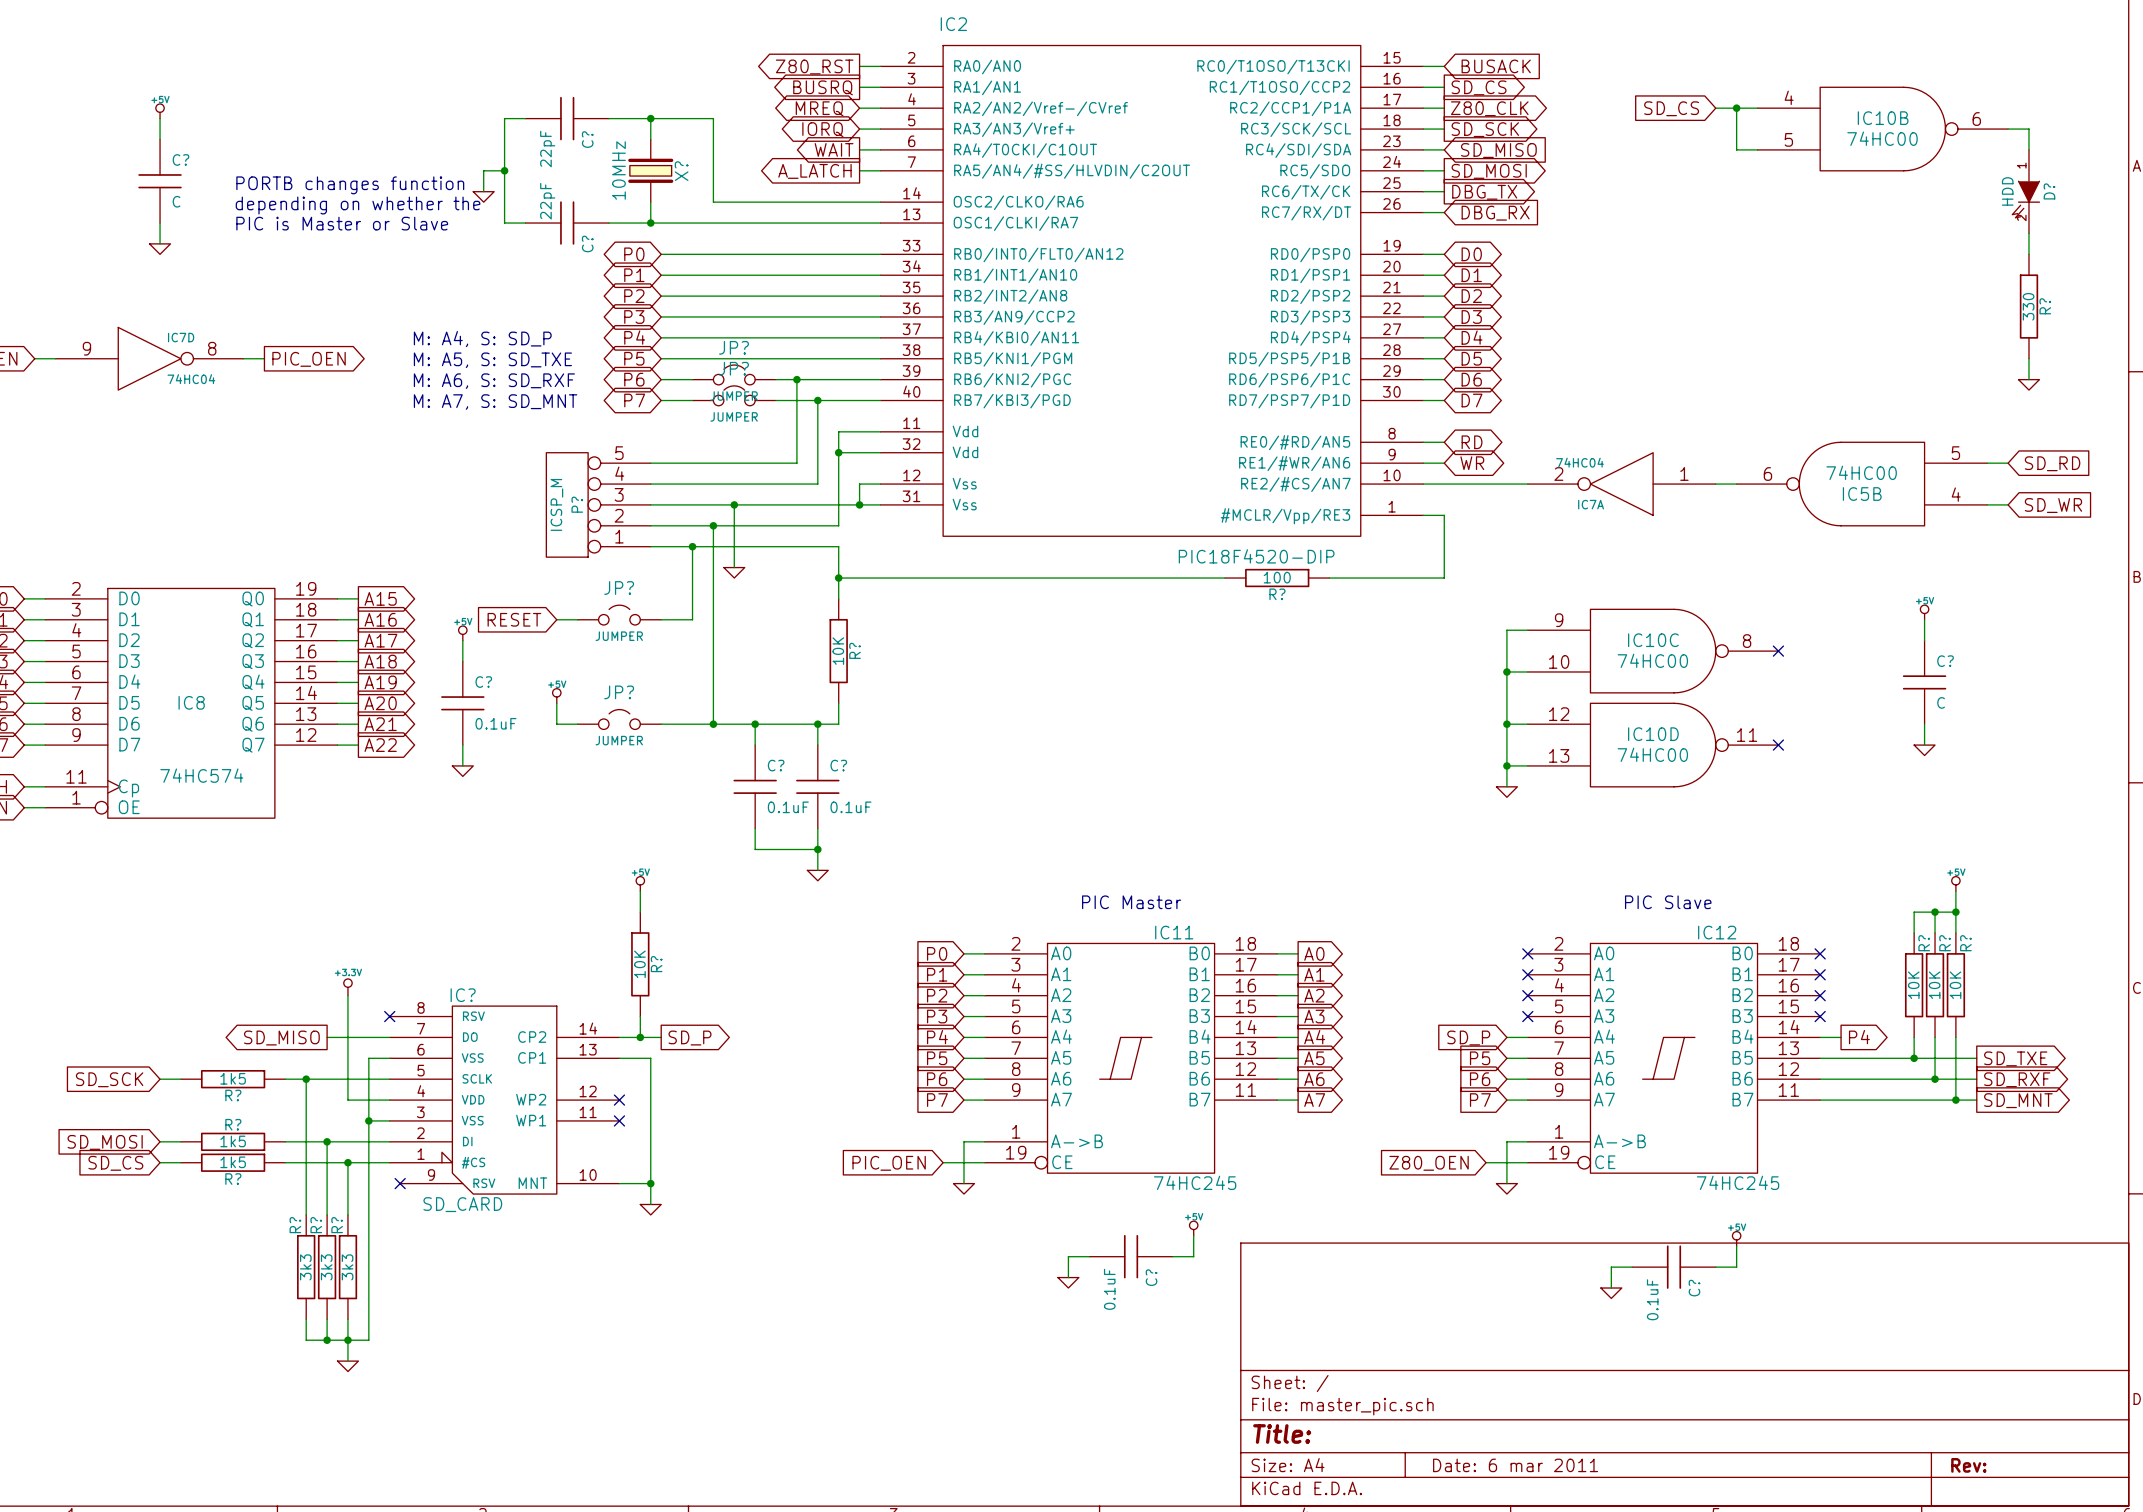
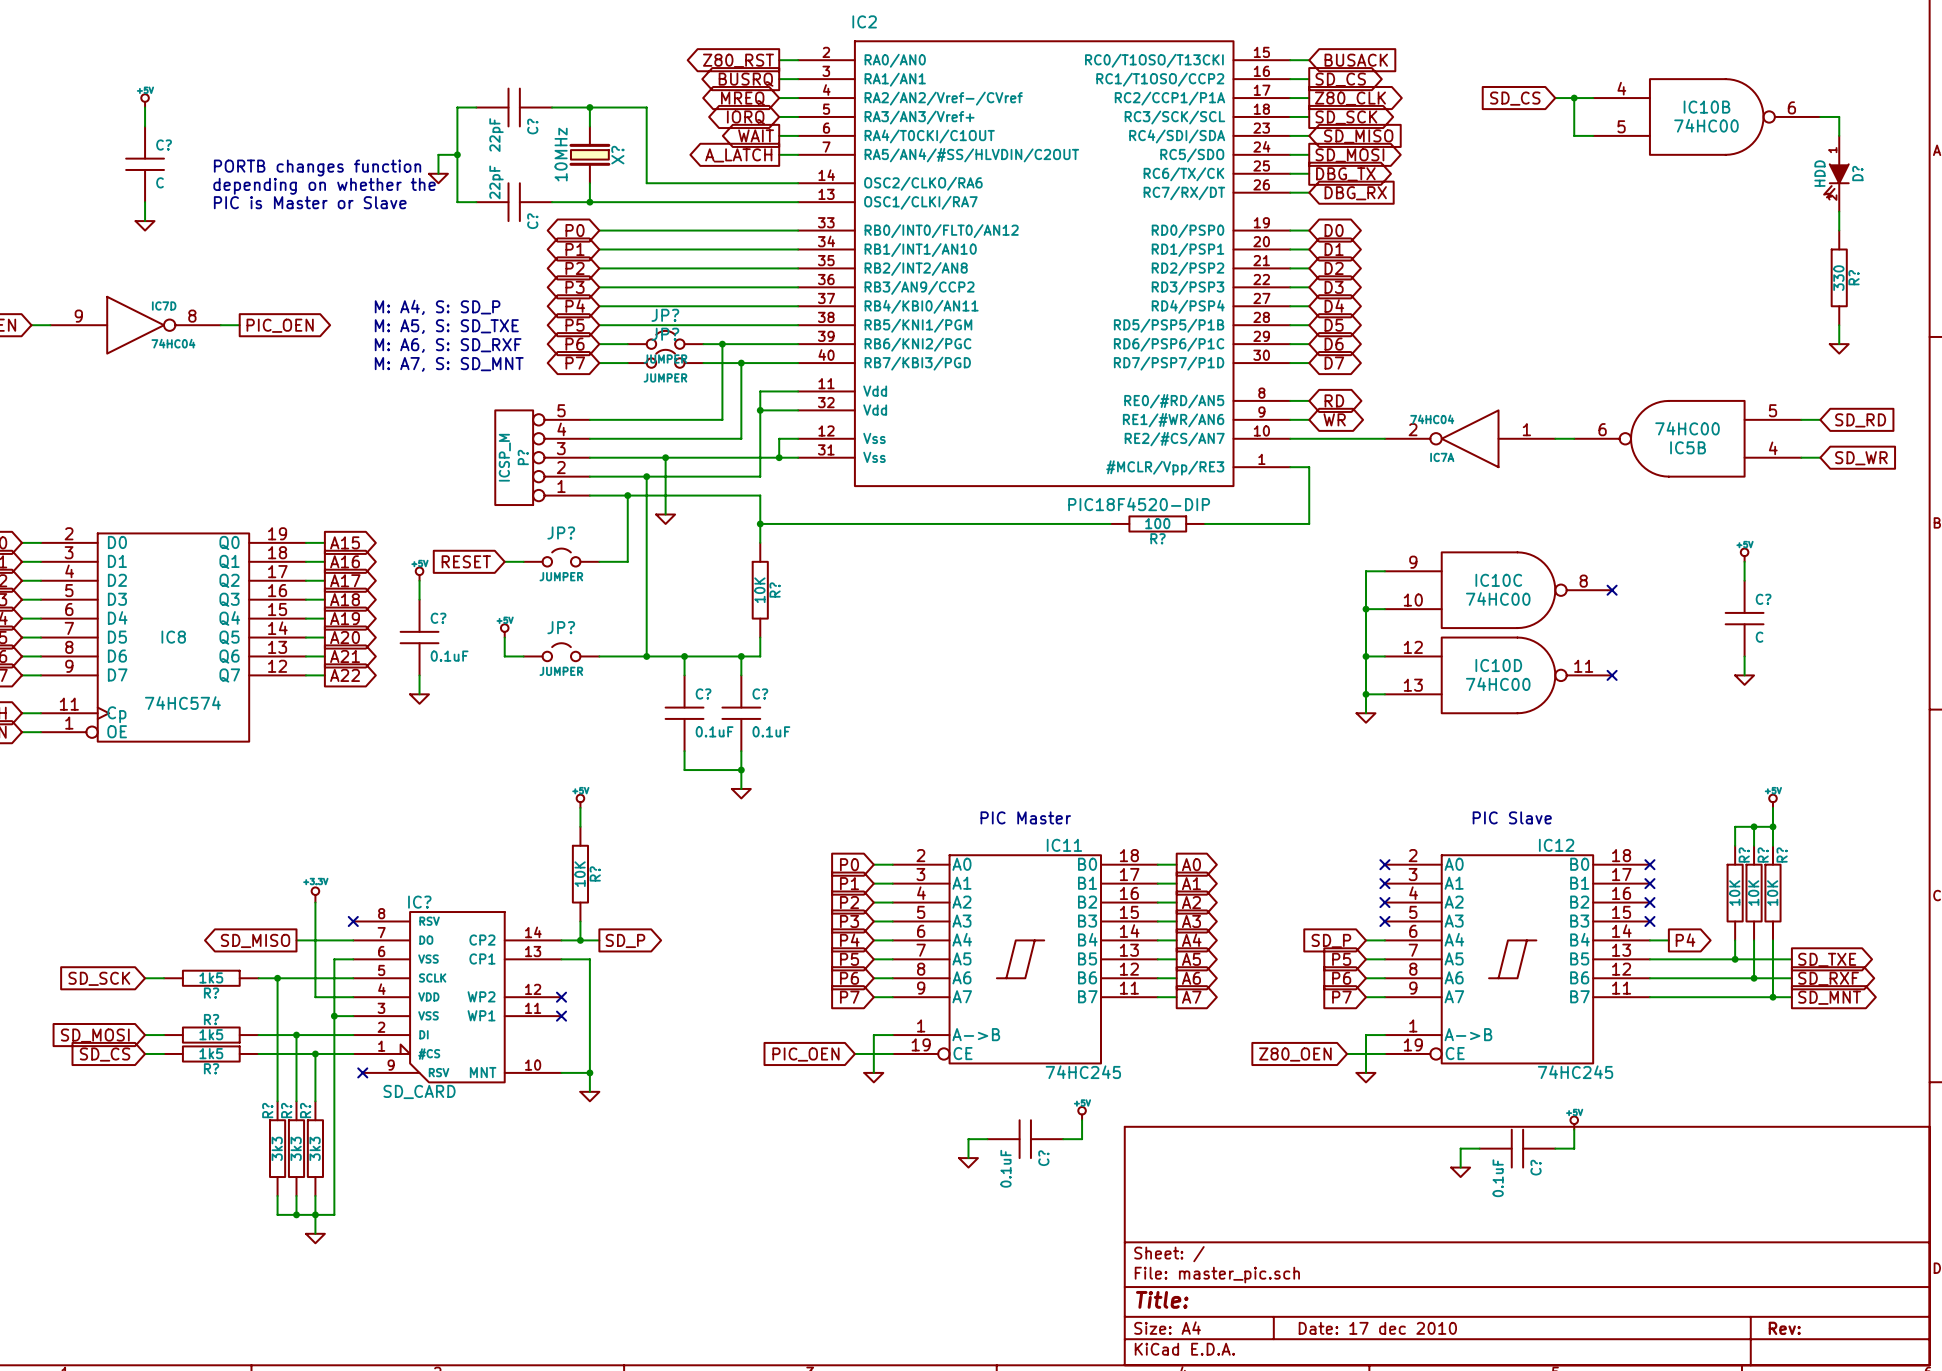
title block: Date: 6 mar 2011 (1515, 1465) -> Date: 17 dec 2010 (1377, 1328)

